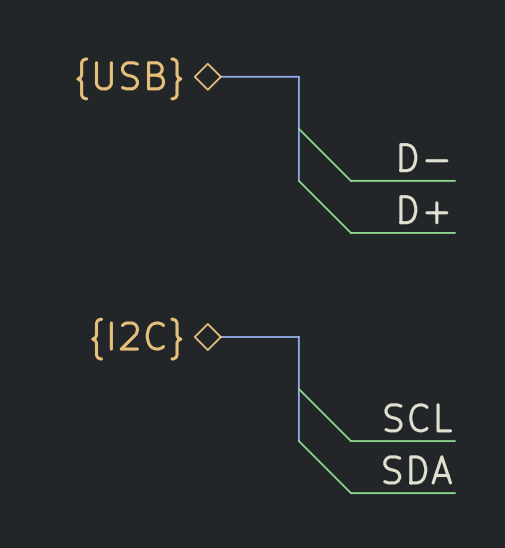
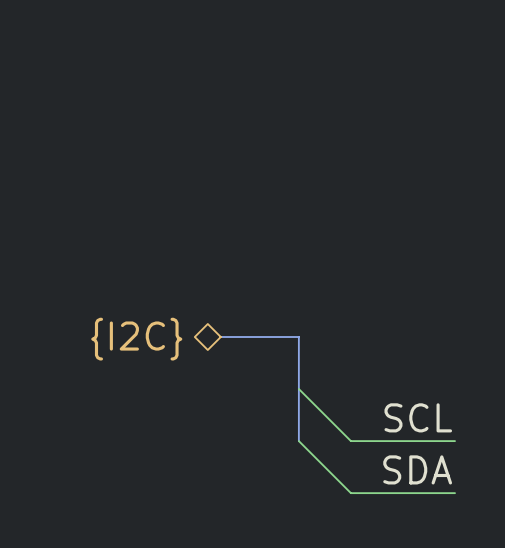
bus: (220, 76) (298, 76) (298, 180) -> none
hierarchical label: {USB} (129, 78) -> none
wire: (298, 128) (350, 180) (455, 180) -> none
label: D- (423, 157) -> none
wire: (298, 180) (350, 232) (455, 232) -> none
label: D+ (423, 209) -> none

